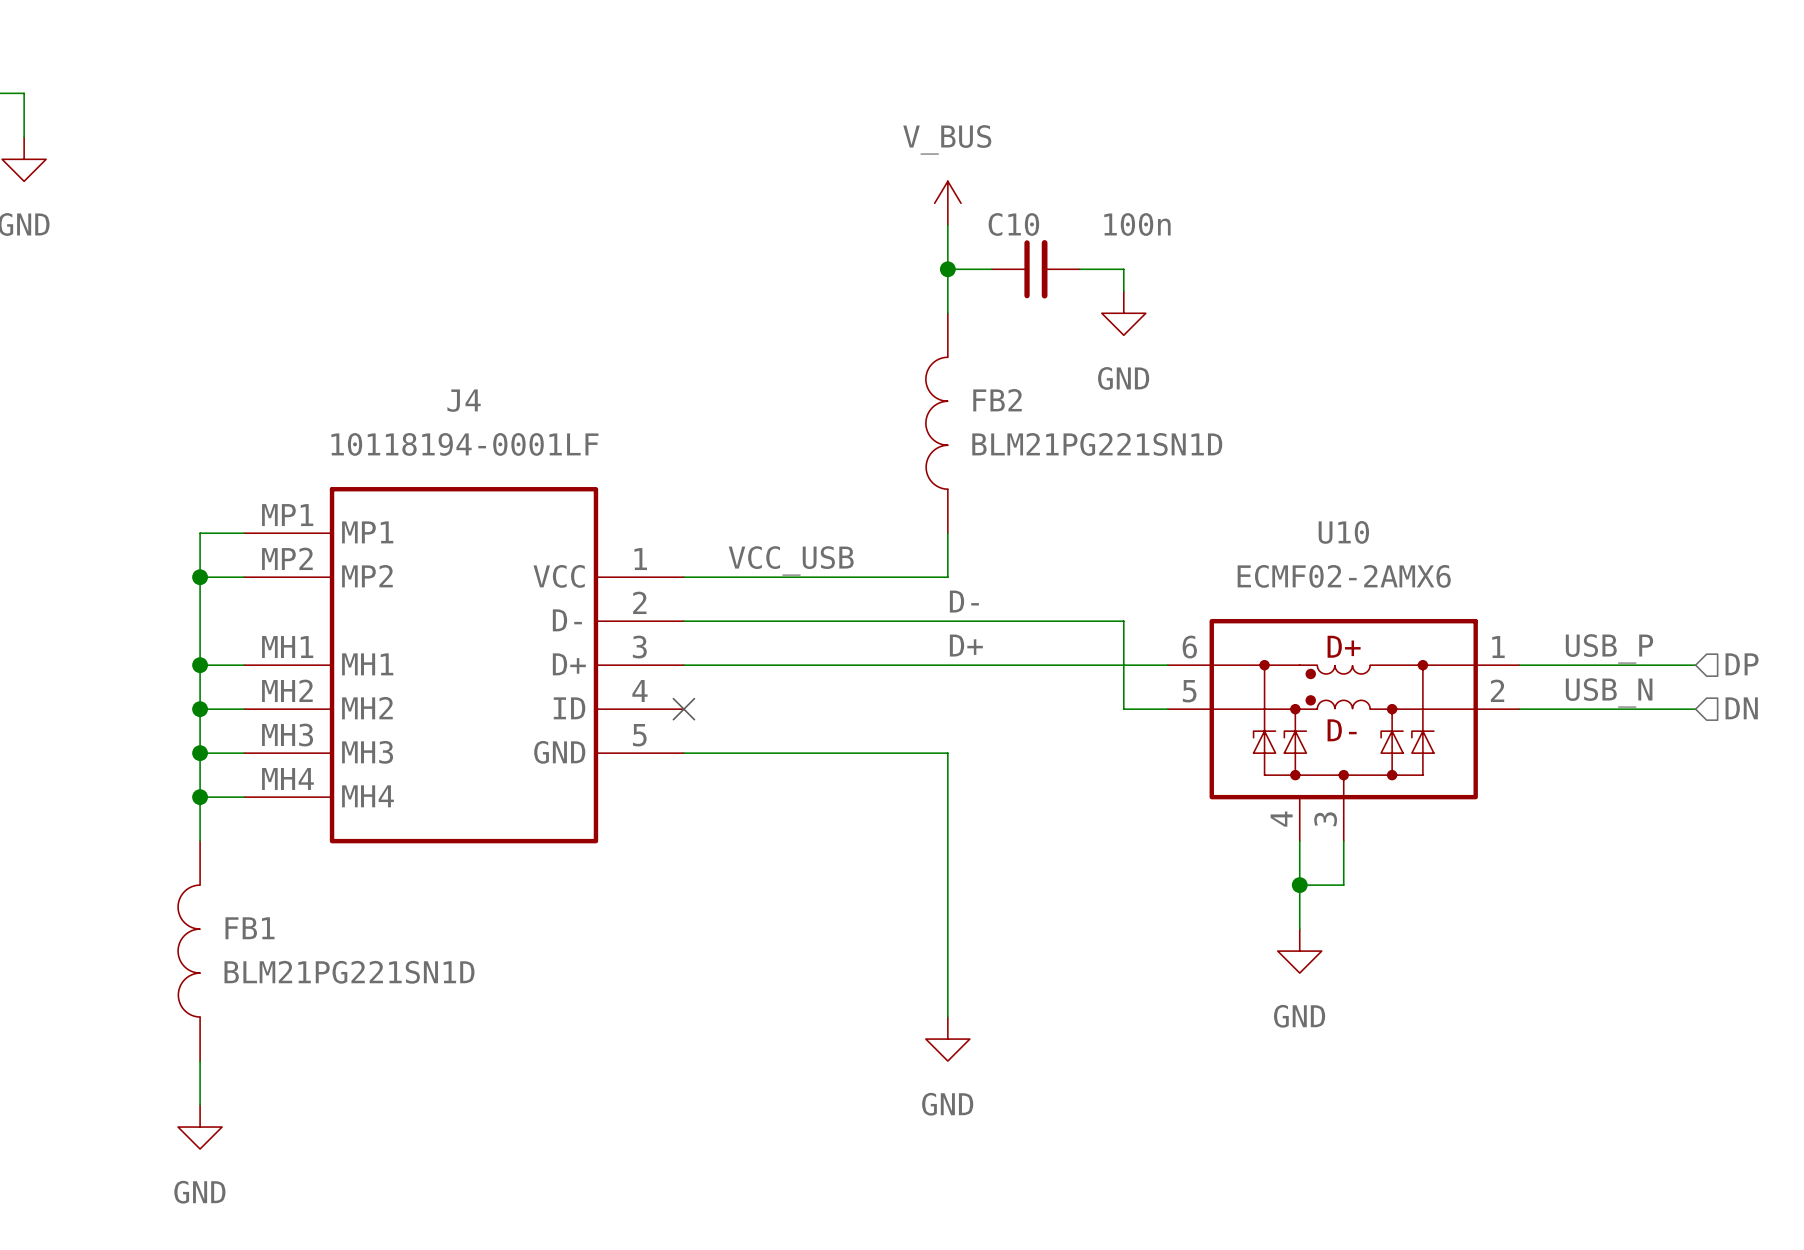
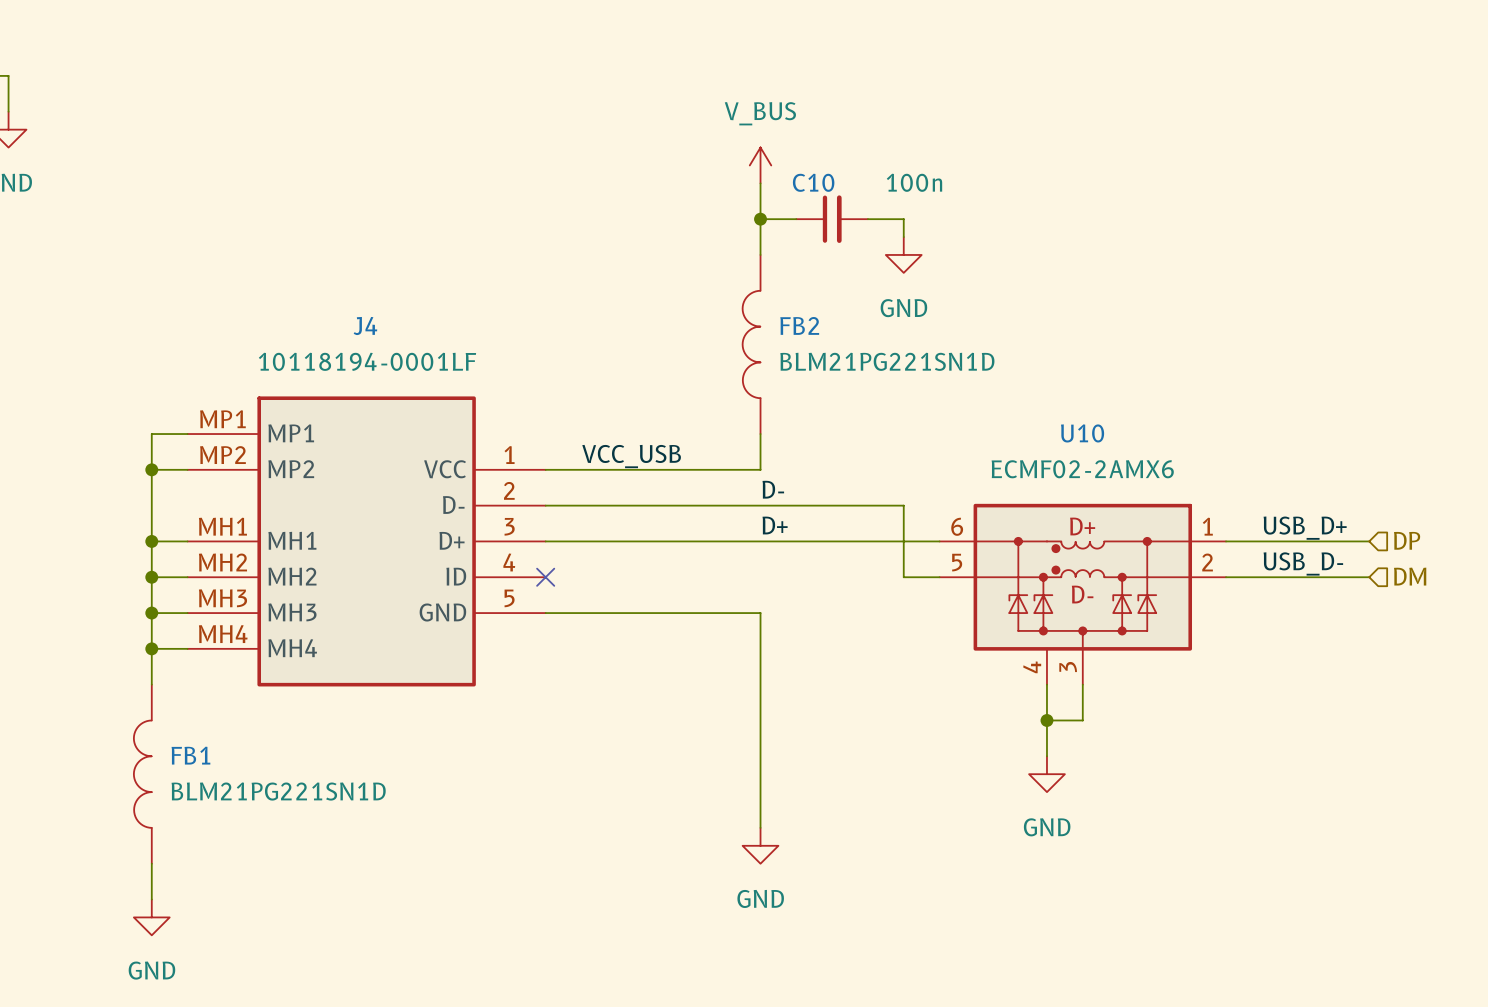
label: USB_P (1609, 648) -> USB_D+ (1305, 528)
label: USB_N (1609, 692) -> USB_D- (1303, 563)
hierarchical label: DN (1741, 708) -> DM (1410, 576)

